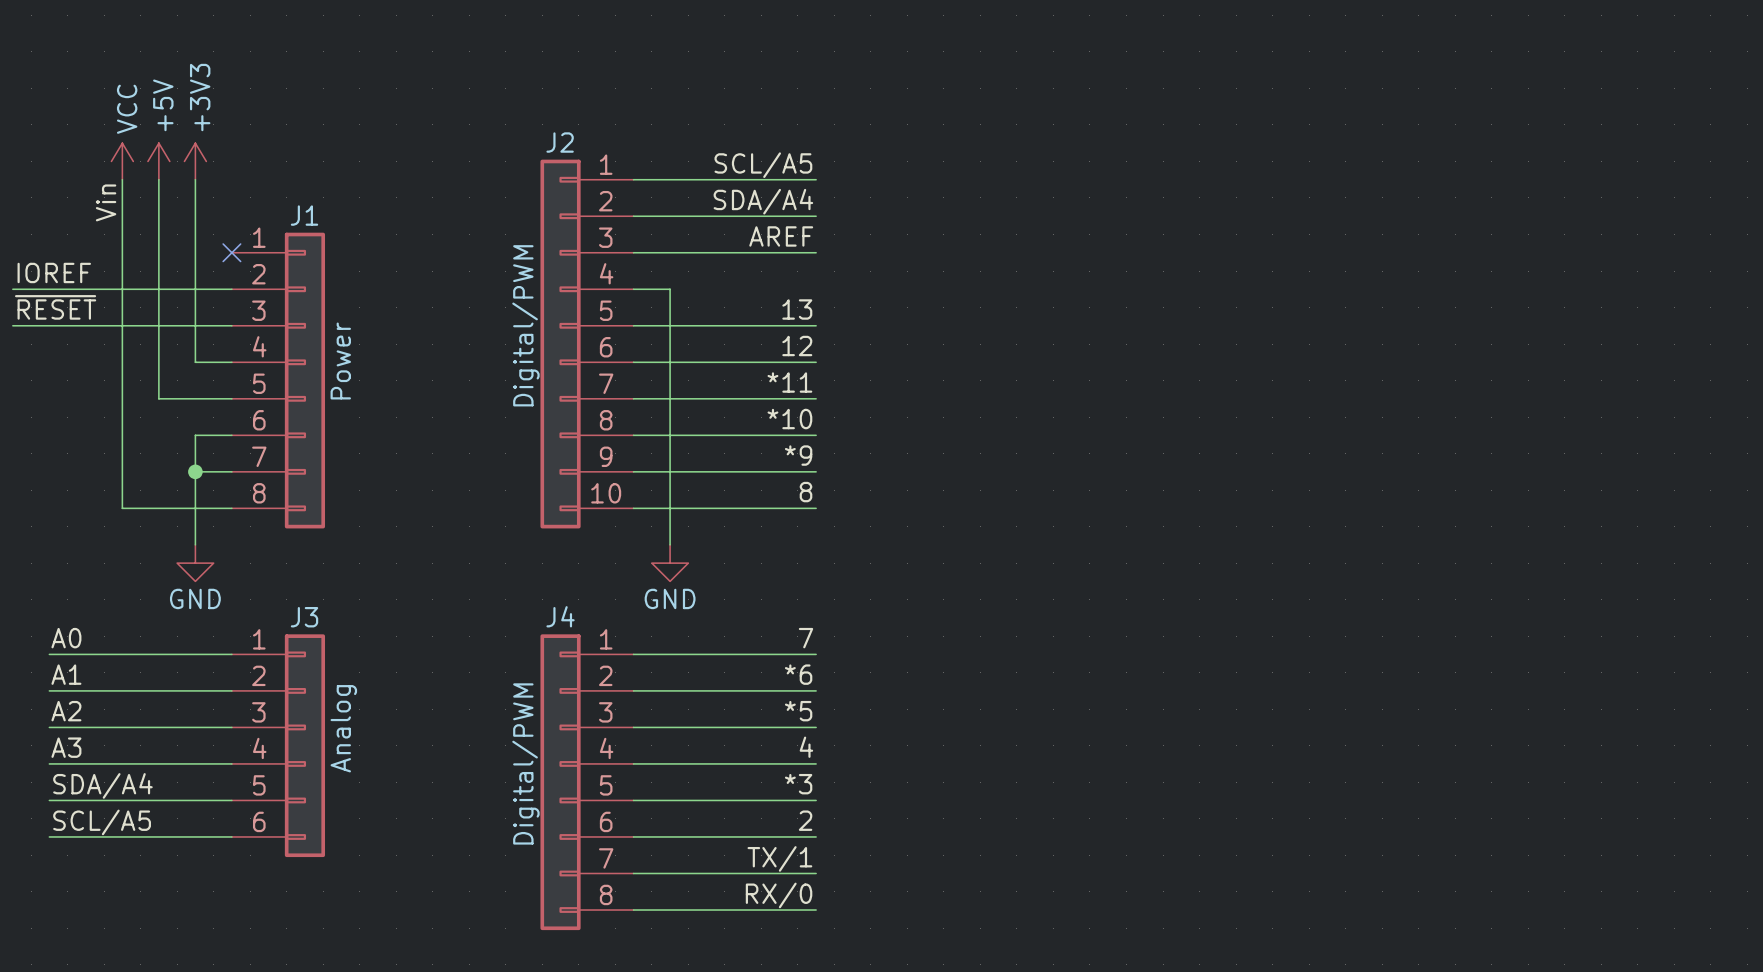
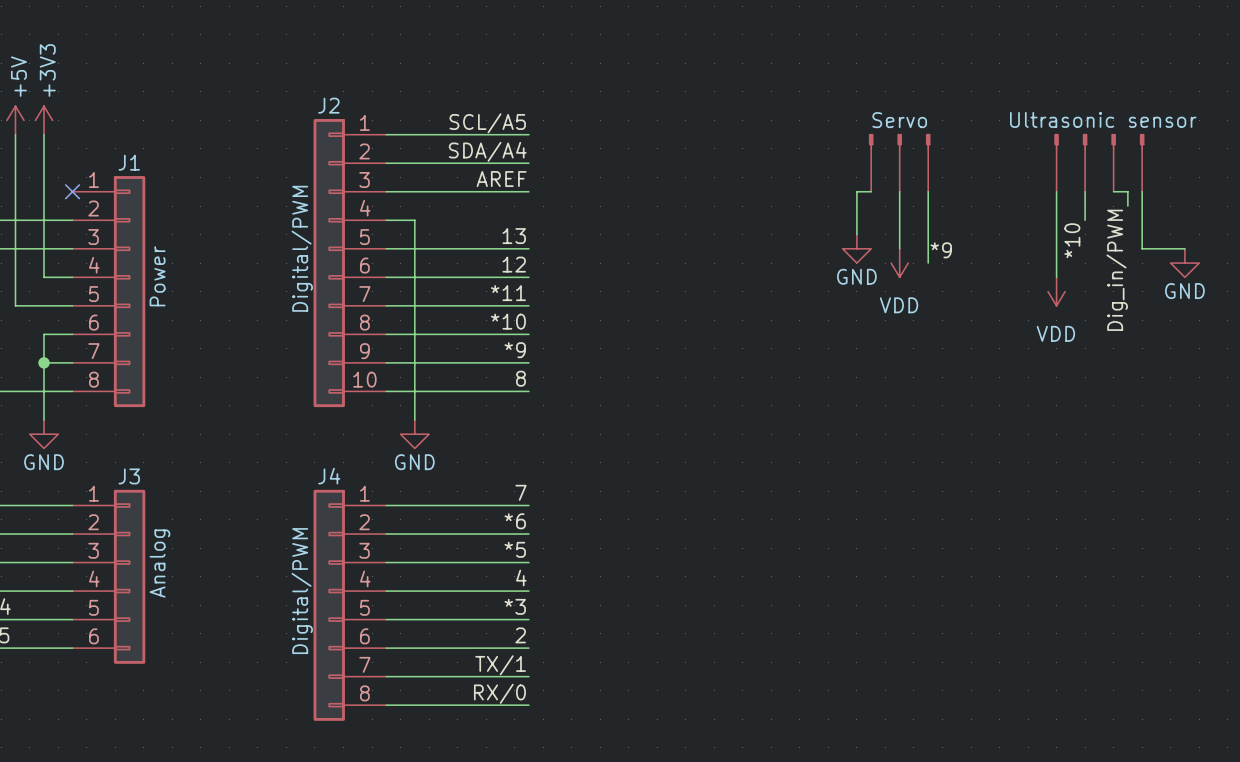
part: none -> Servo (899, 162)
part: none -> Ultrasonic sensor (1099, 162)
wire: none -> (871, 191) (856, 191) (856, 234)
wire: none -> (899, 191) (899, 248)
wire: none -> (928, 191) (928, 263)
wire: none -> (1056, 191) (1056, 277)
wire: none -> (1085, 191) (1085, 220)
wire: none -> (1113, 191) (1127, 191) (1127, 206)
wire: none -> (1142, 191) (1142, 248) (1184, 248)
label: none -> *10 (1072, 240)
power symbol: none -> GND (856, 248)
label: none -> *9 (941, 250)
power symbol: none -> VDD (899, 263)
power symbol: none -> GND (1184, 263)
label: none -> Dig_in/PWM (1117, 270)
power symbol: none -> VDD (1056, 291)

